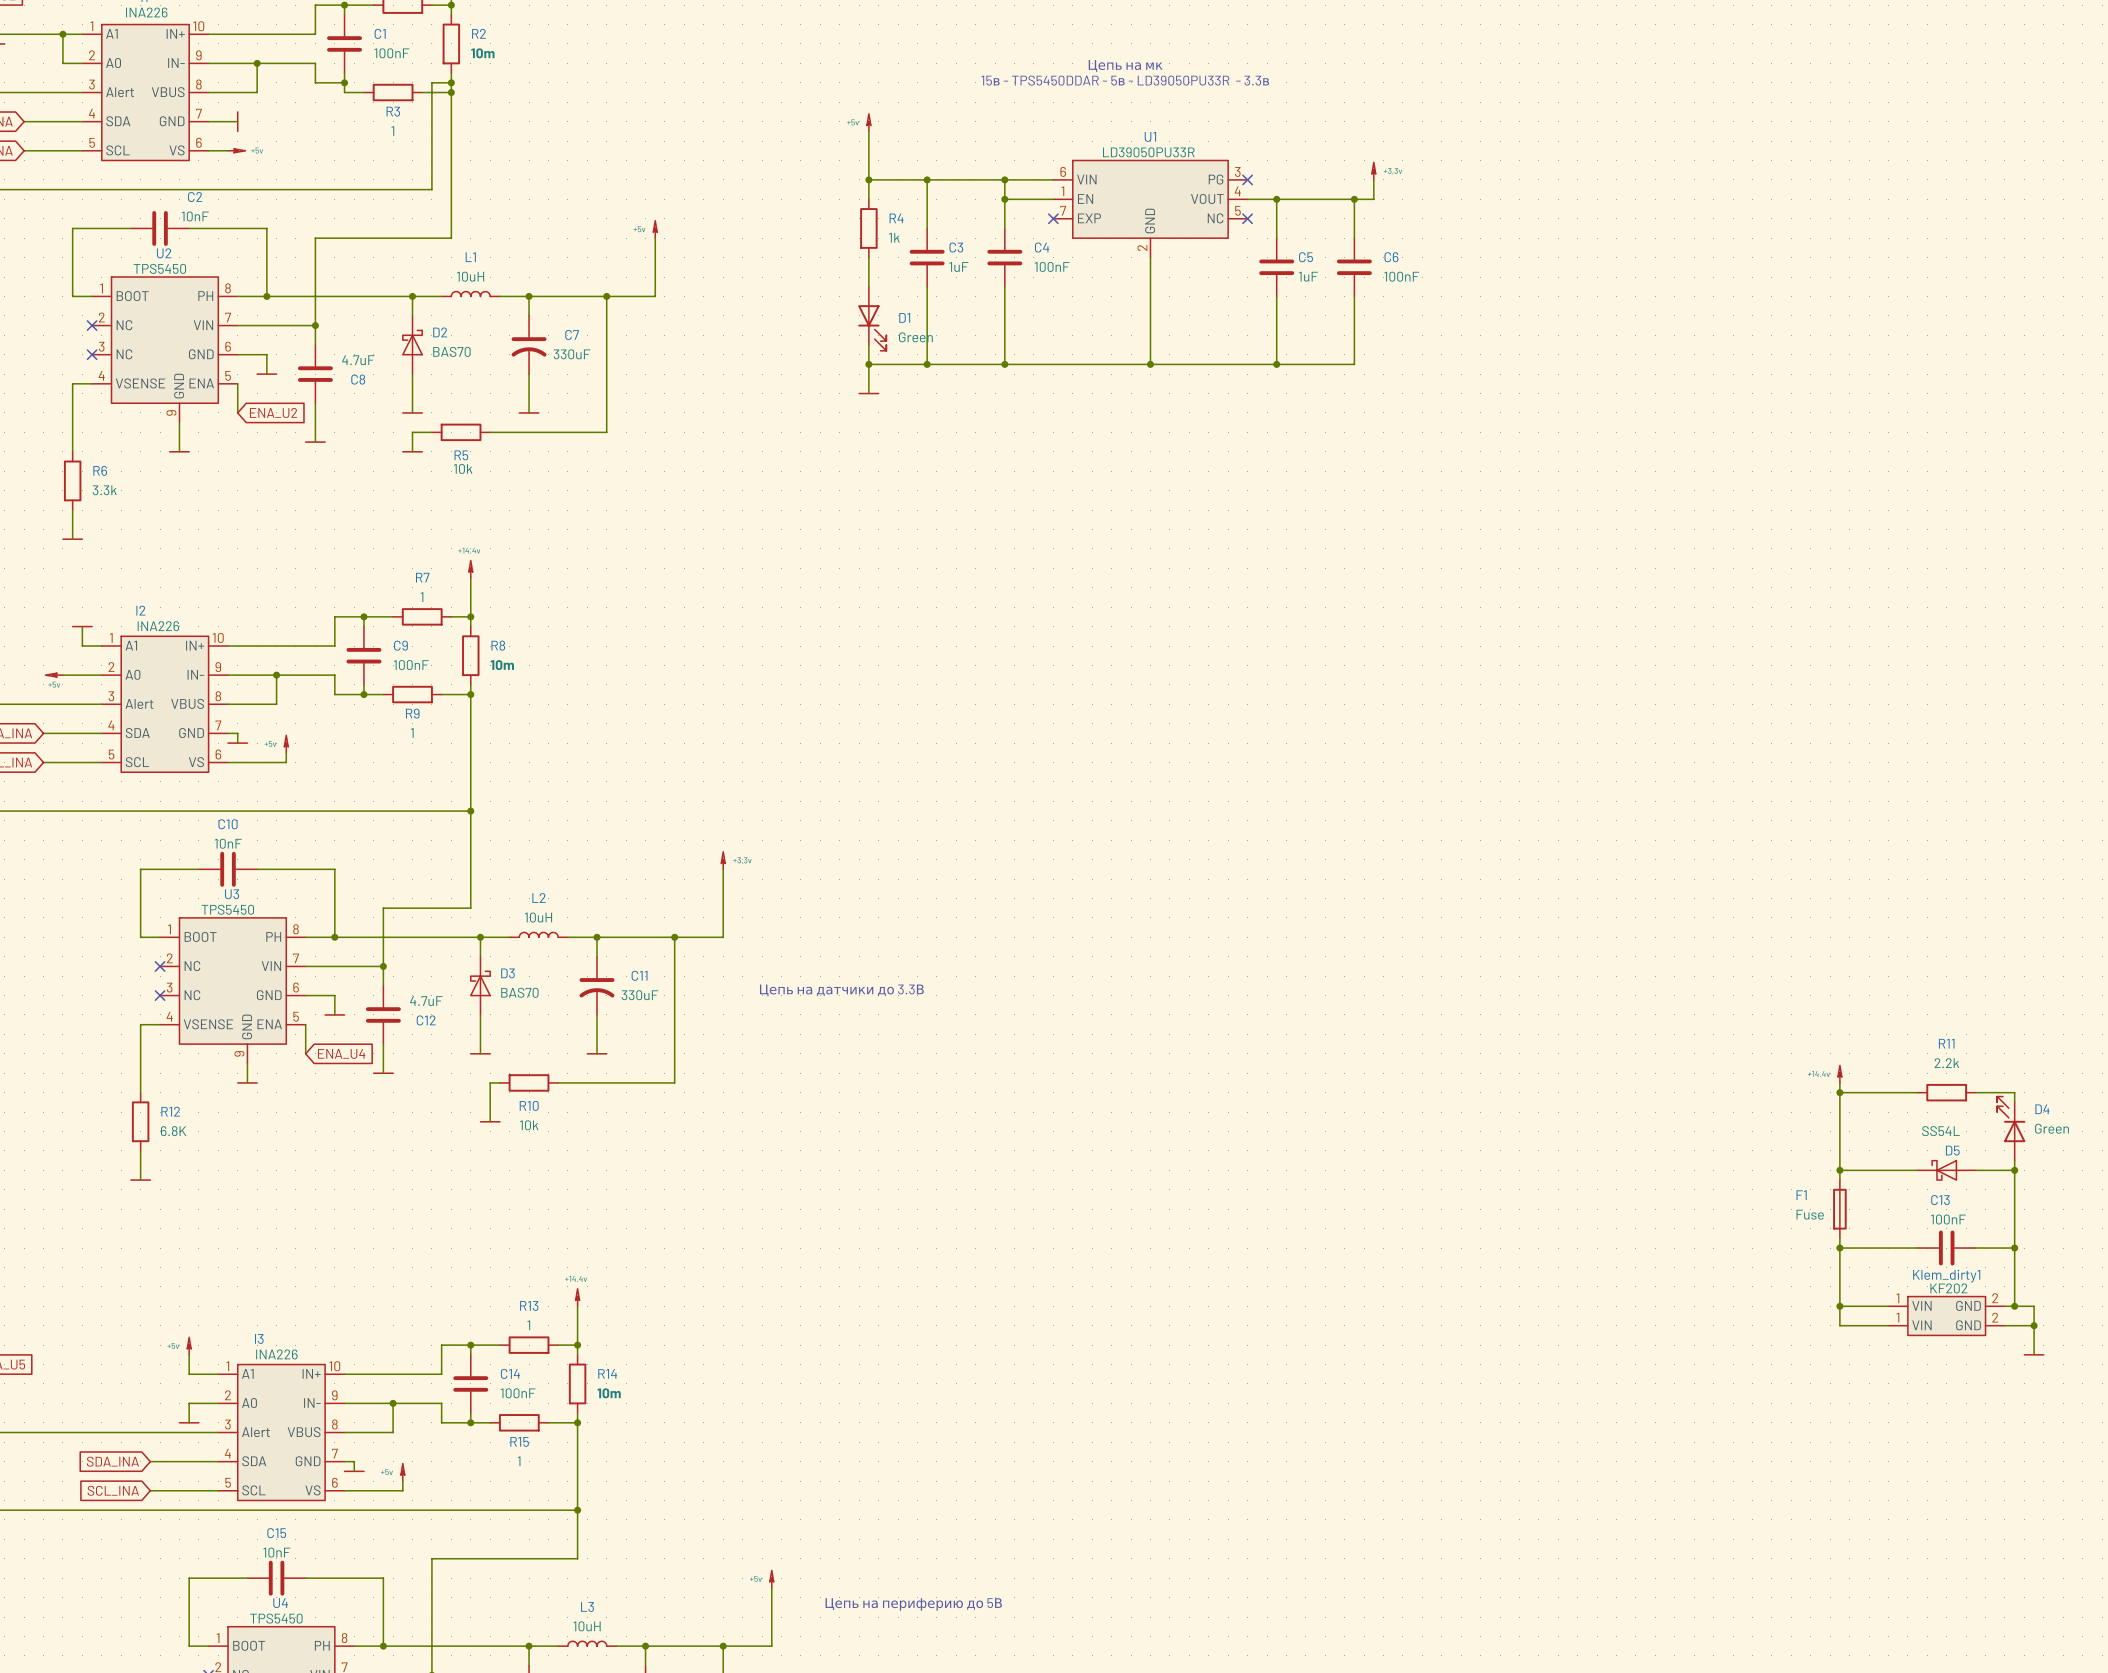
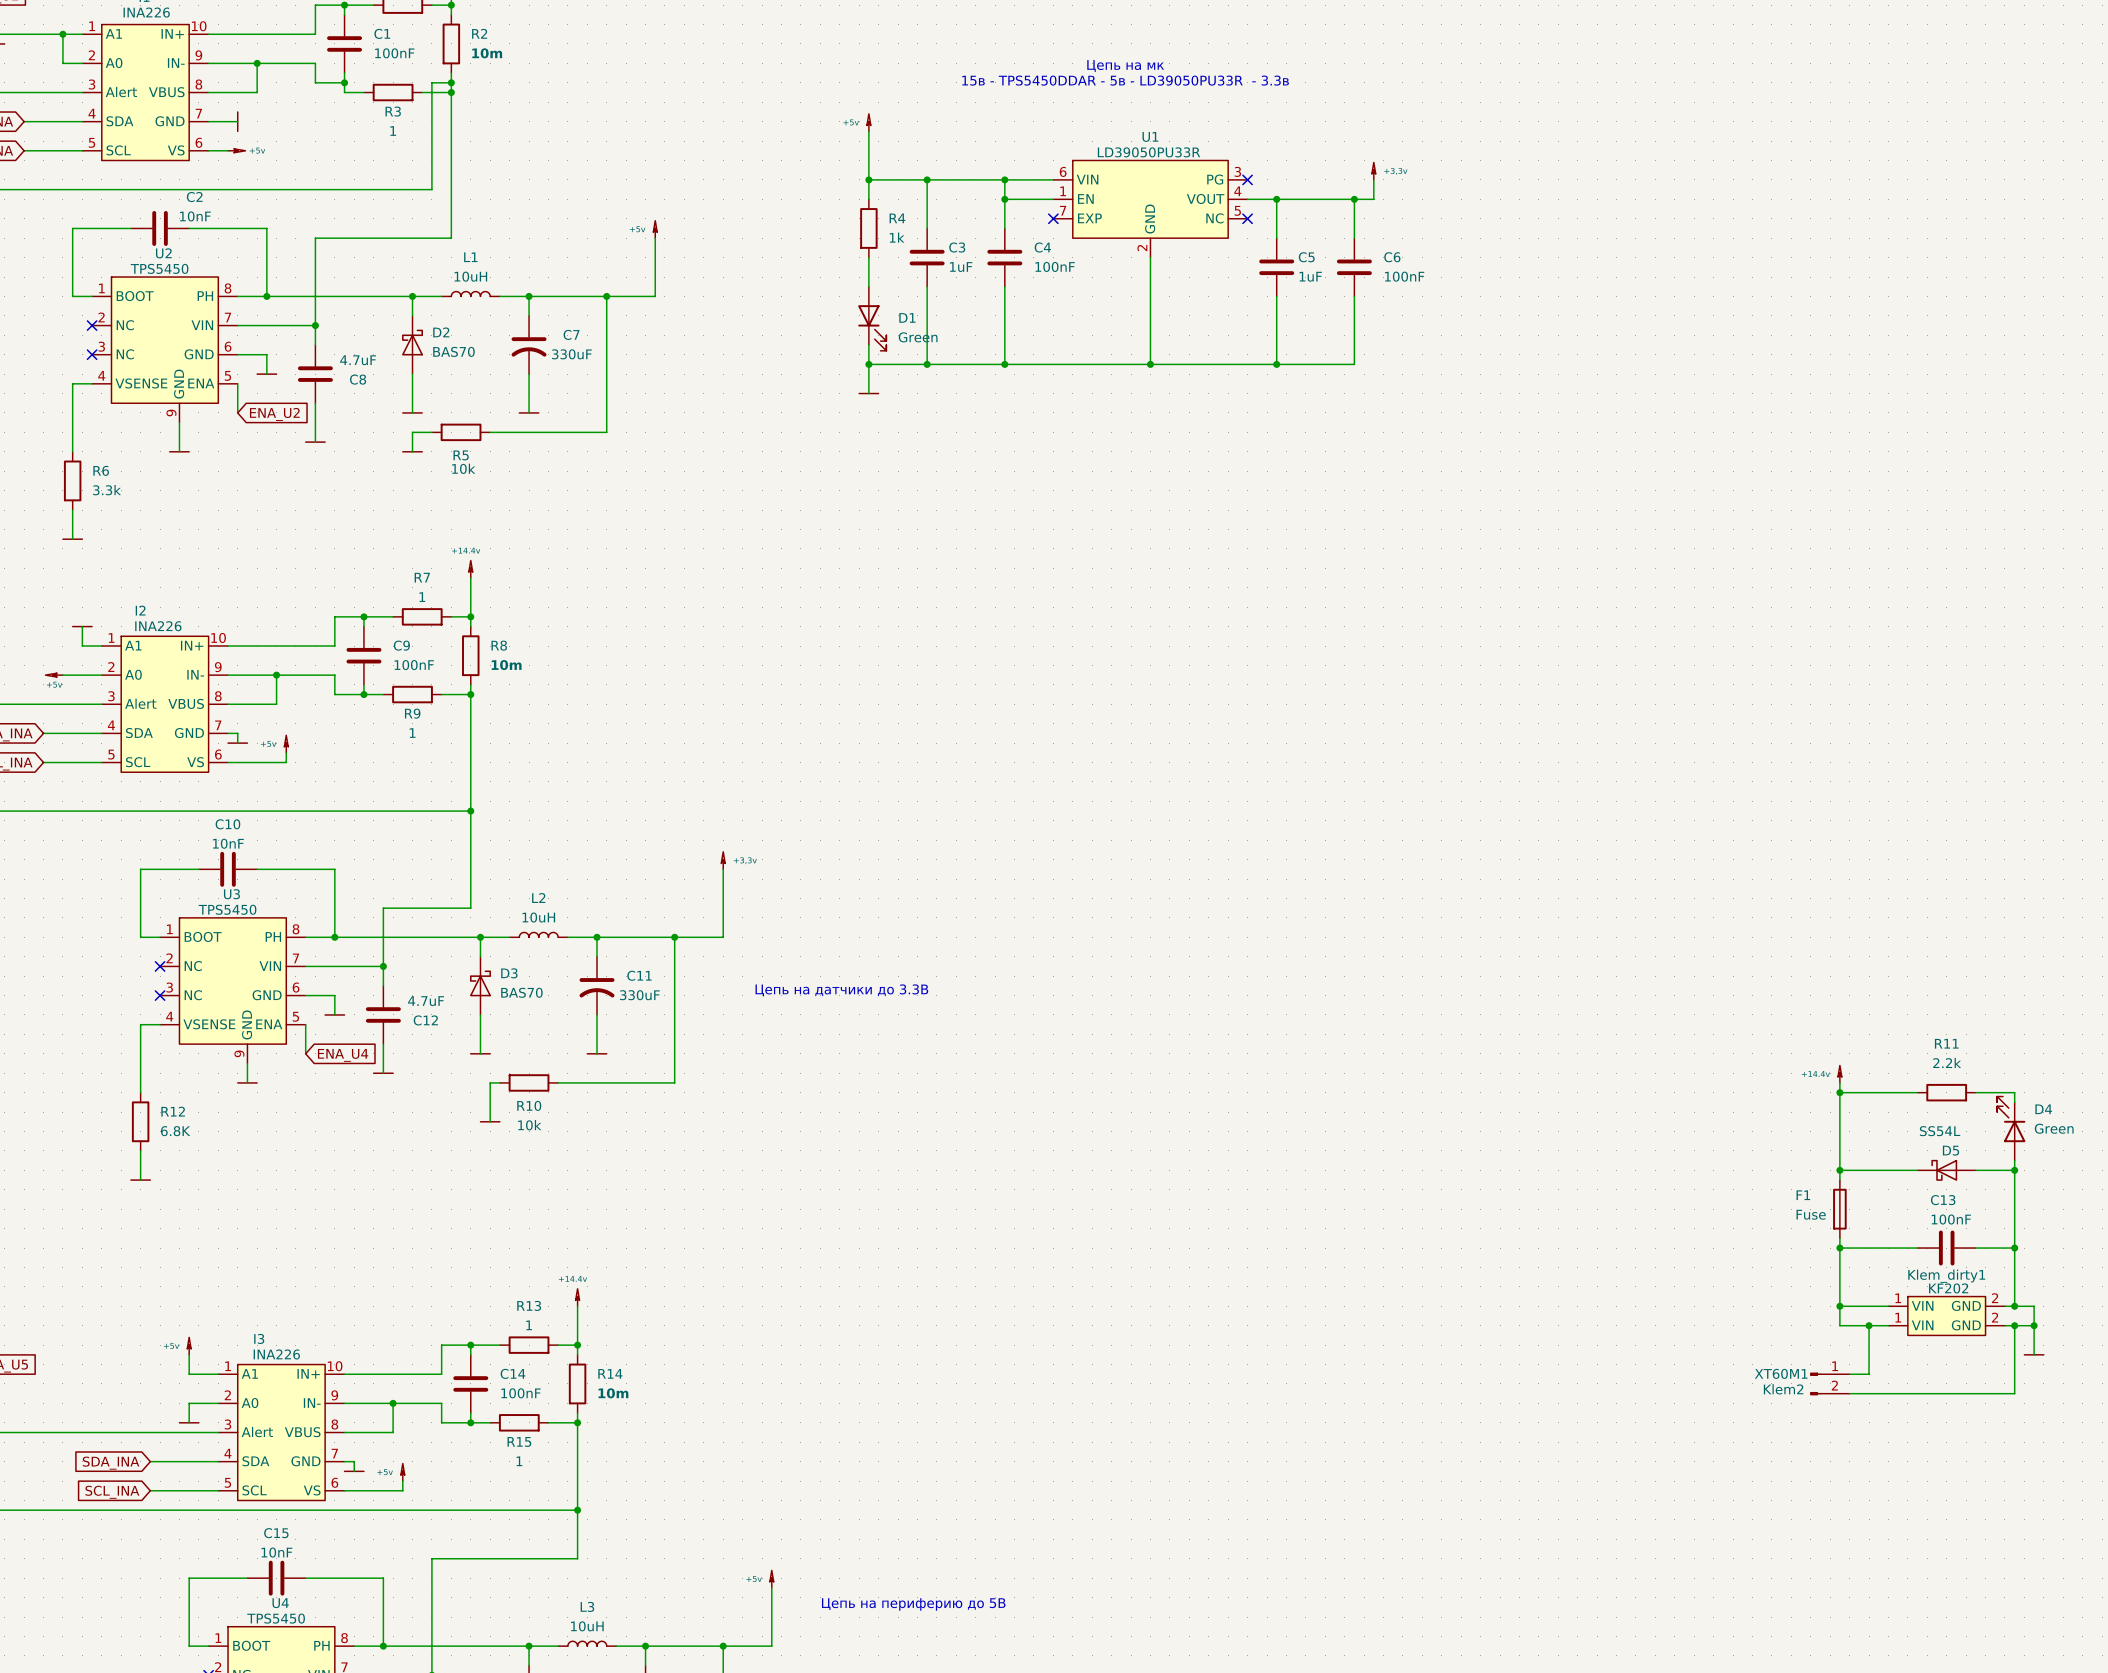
wire: none -> (1869, 1325) (1869, 1374) (1849, 1374)
junction: none -> (1869, 1325)
wire: none -> (2014, 1325) (2014, 1393) (1849, 1393)
junction: none -> (2014, 1325)
XT60M1: none -> Klem2 (1829, 1383)

